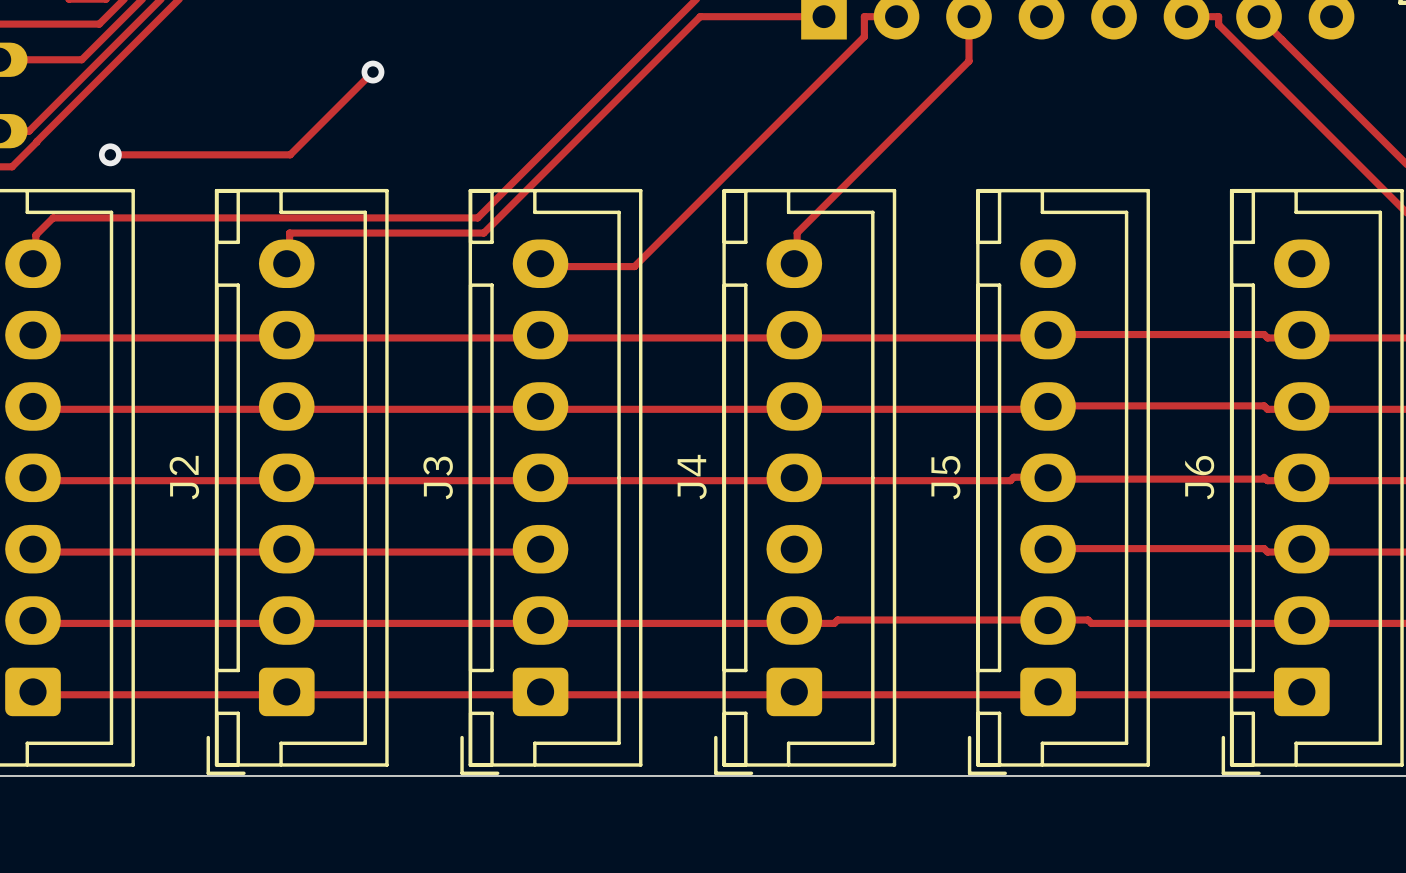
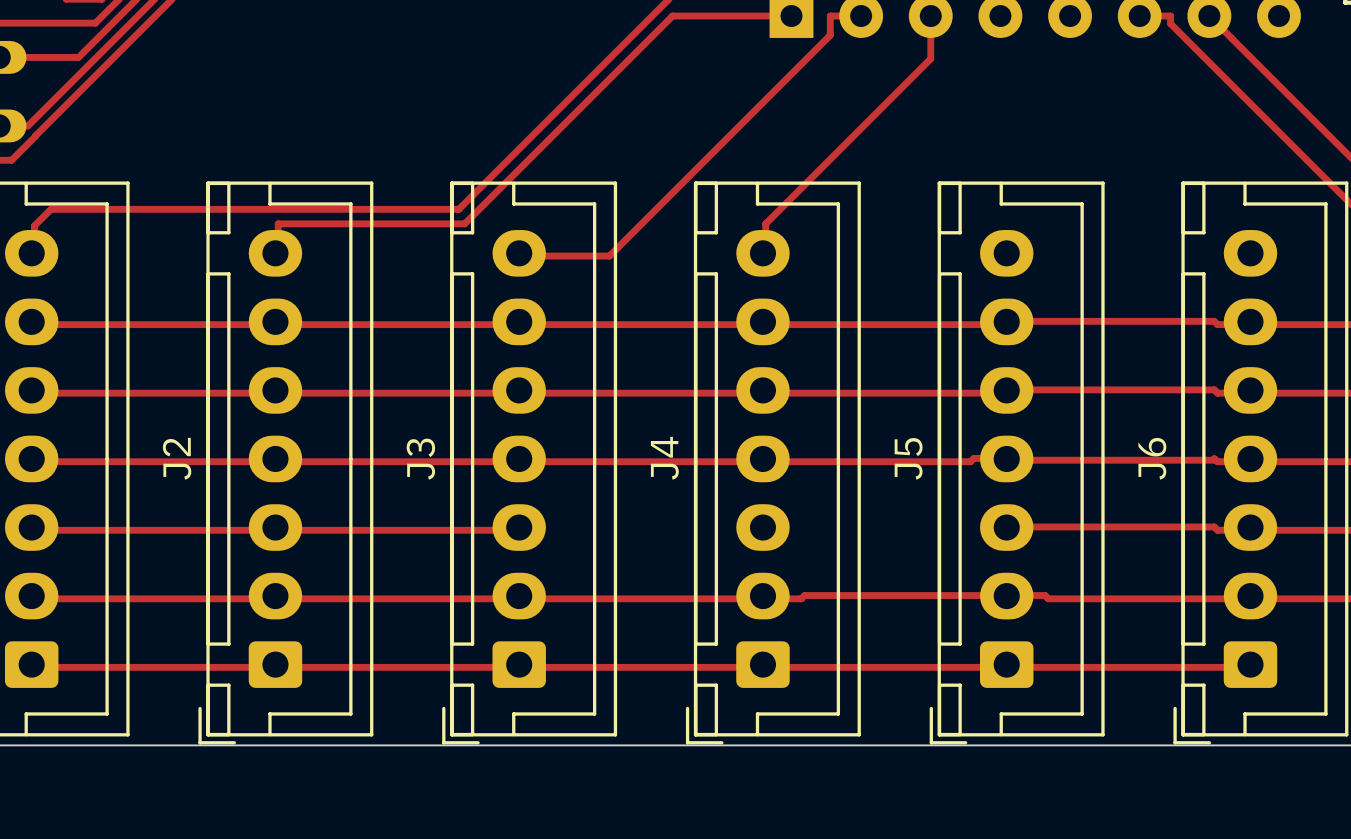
track: (372, 72) (290, 154) (110, 154) -> none
via: (372, 72) -> none
via: (110, 154) -> none

